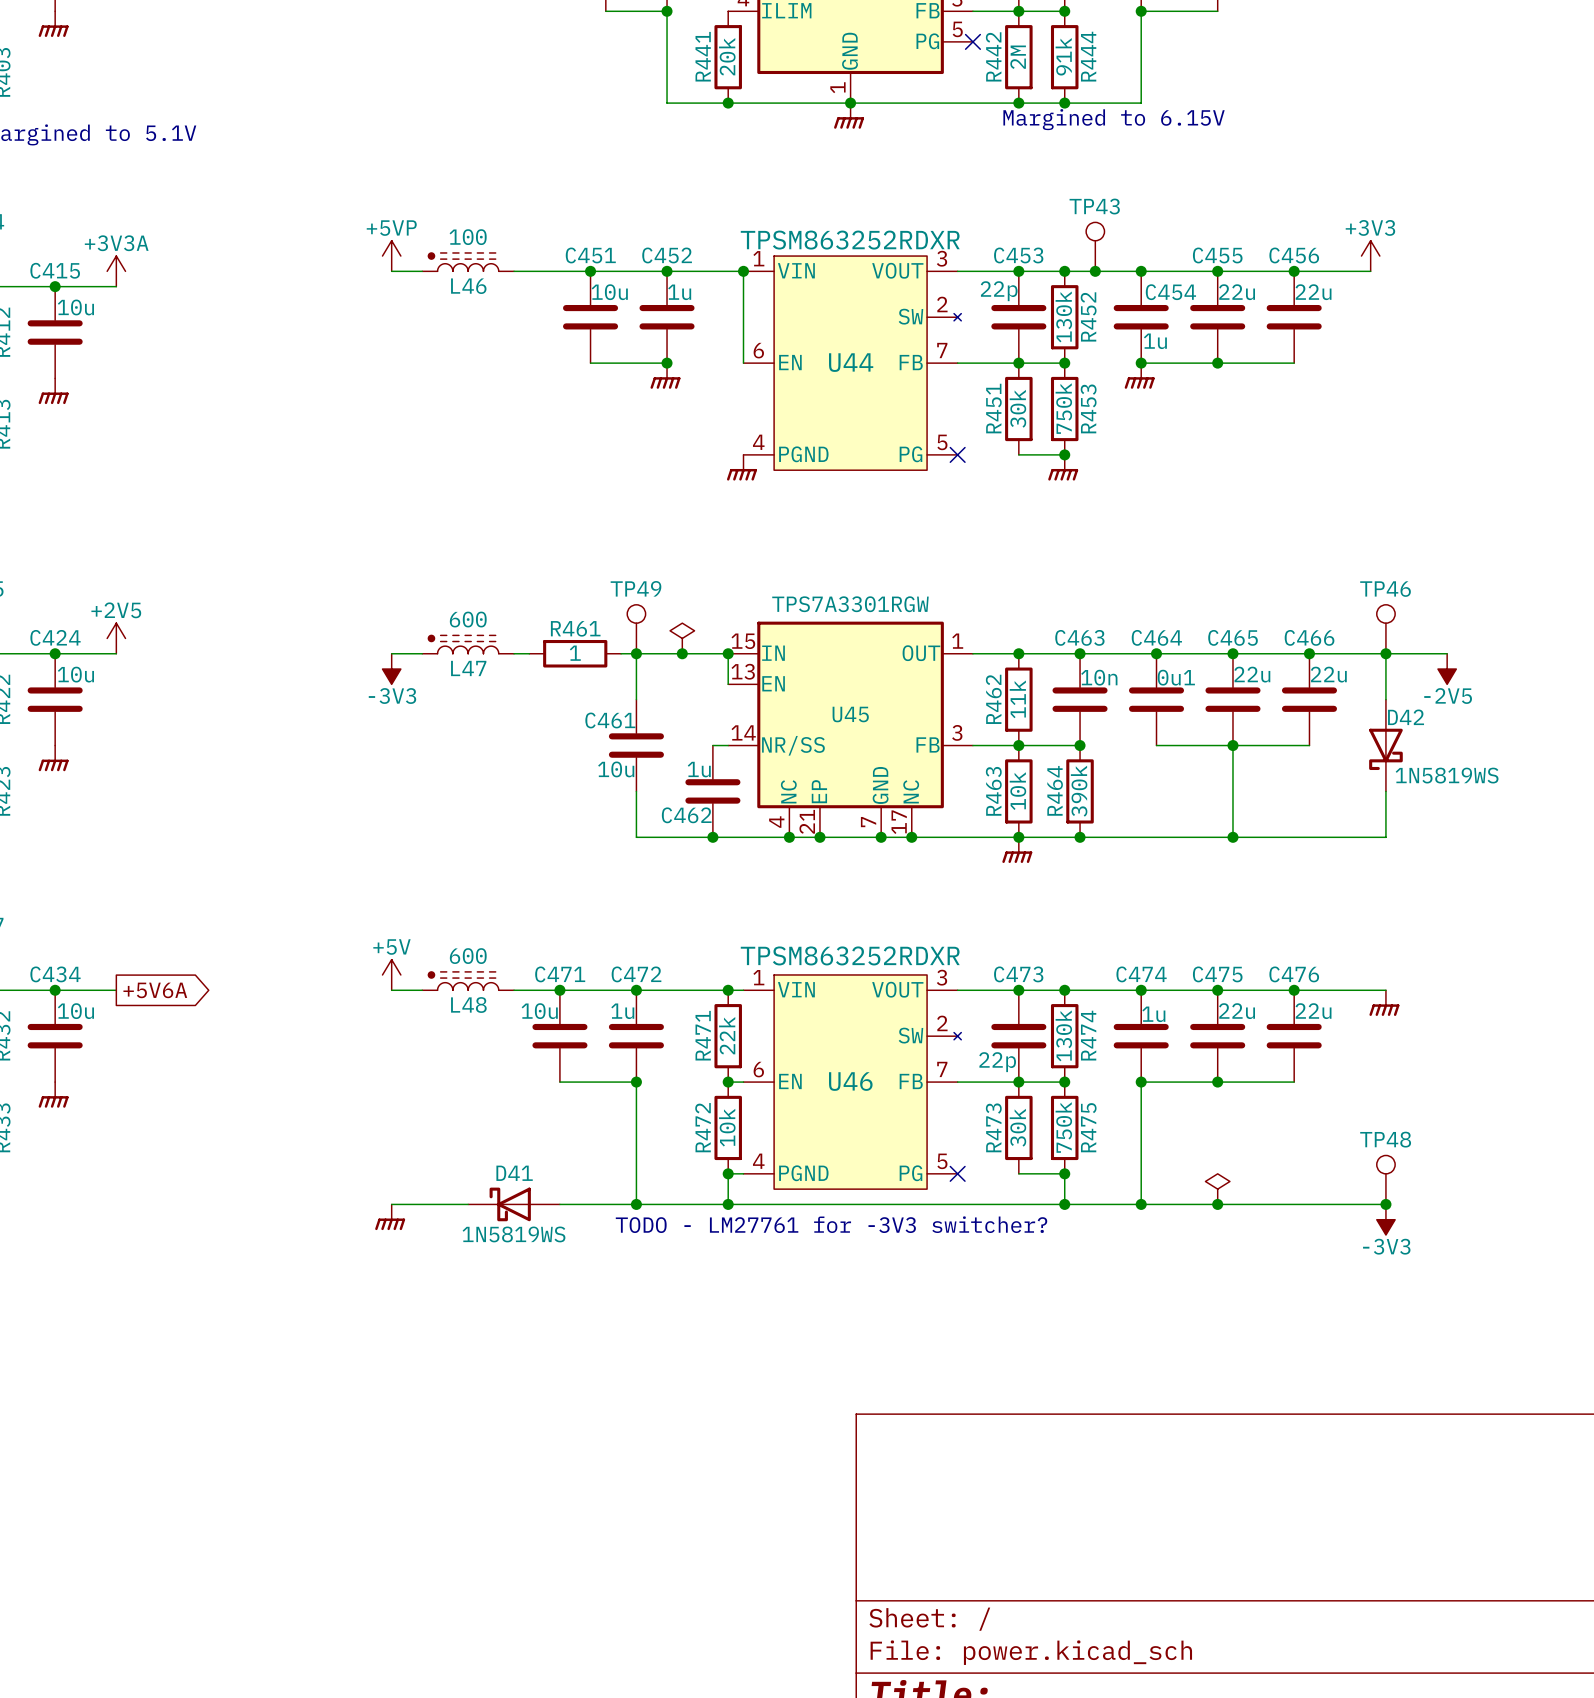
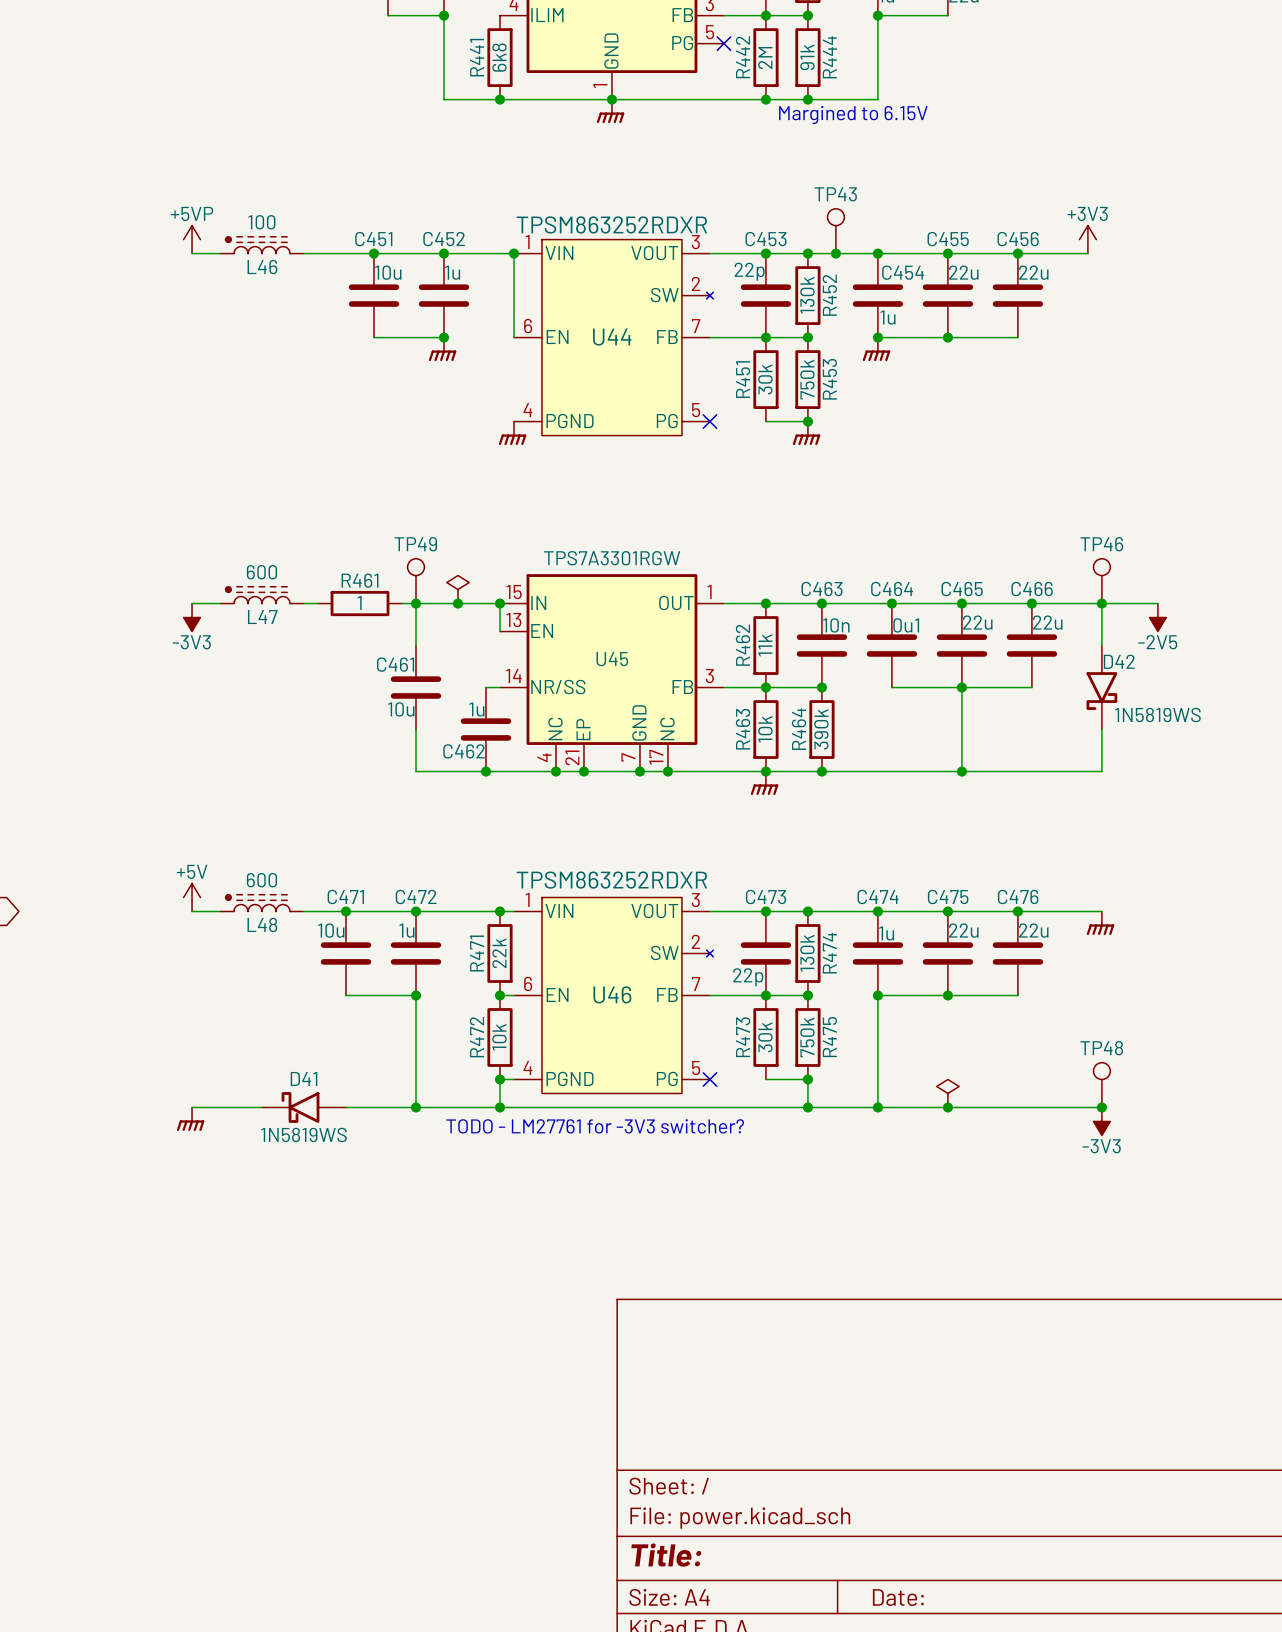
R441 value: 20k (727, 56) -> 6k8 (499, 57)
D42 symbol: [1369, 699, 1403, 792] -> [1086, 645, 1118, 730]
D41 symbol: [468, 1187, 560, 1222] -> [262, 1092, 347, 1123]

